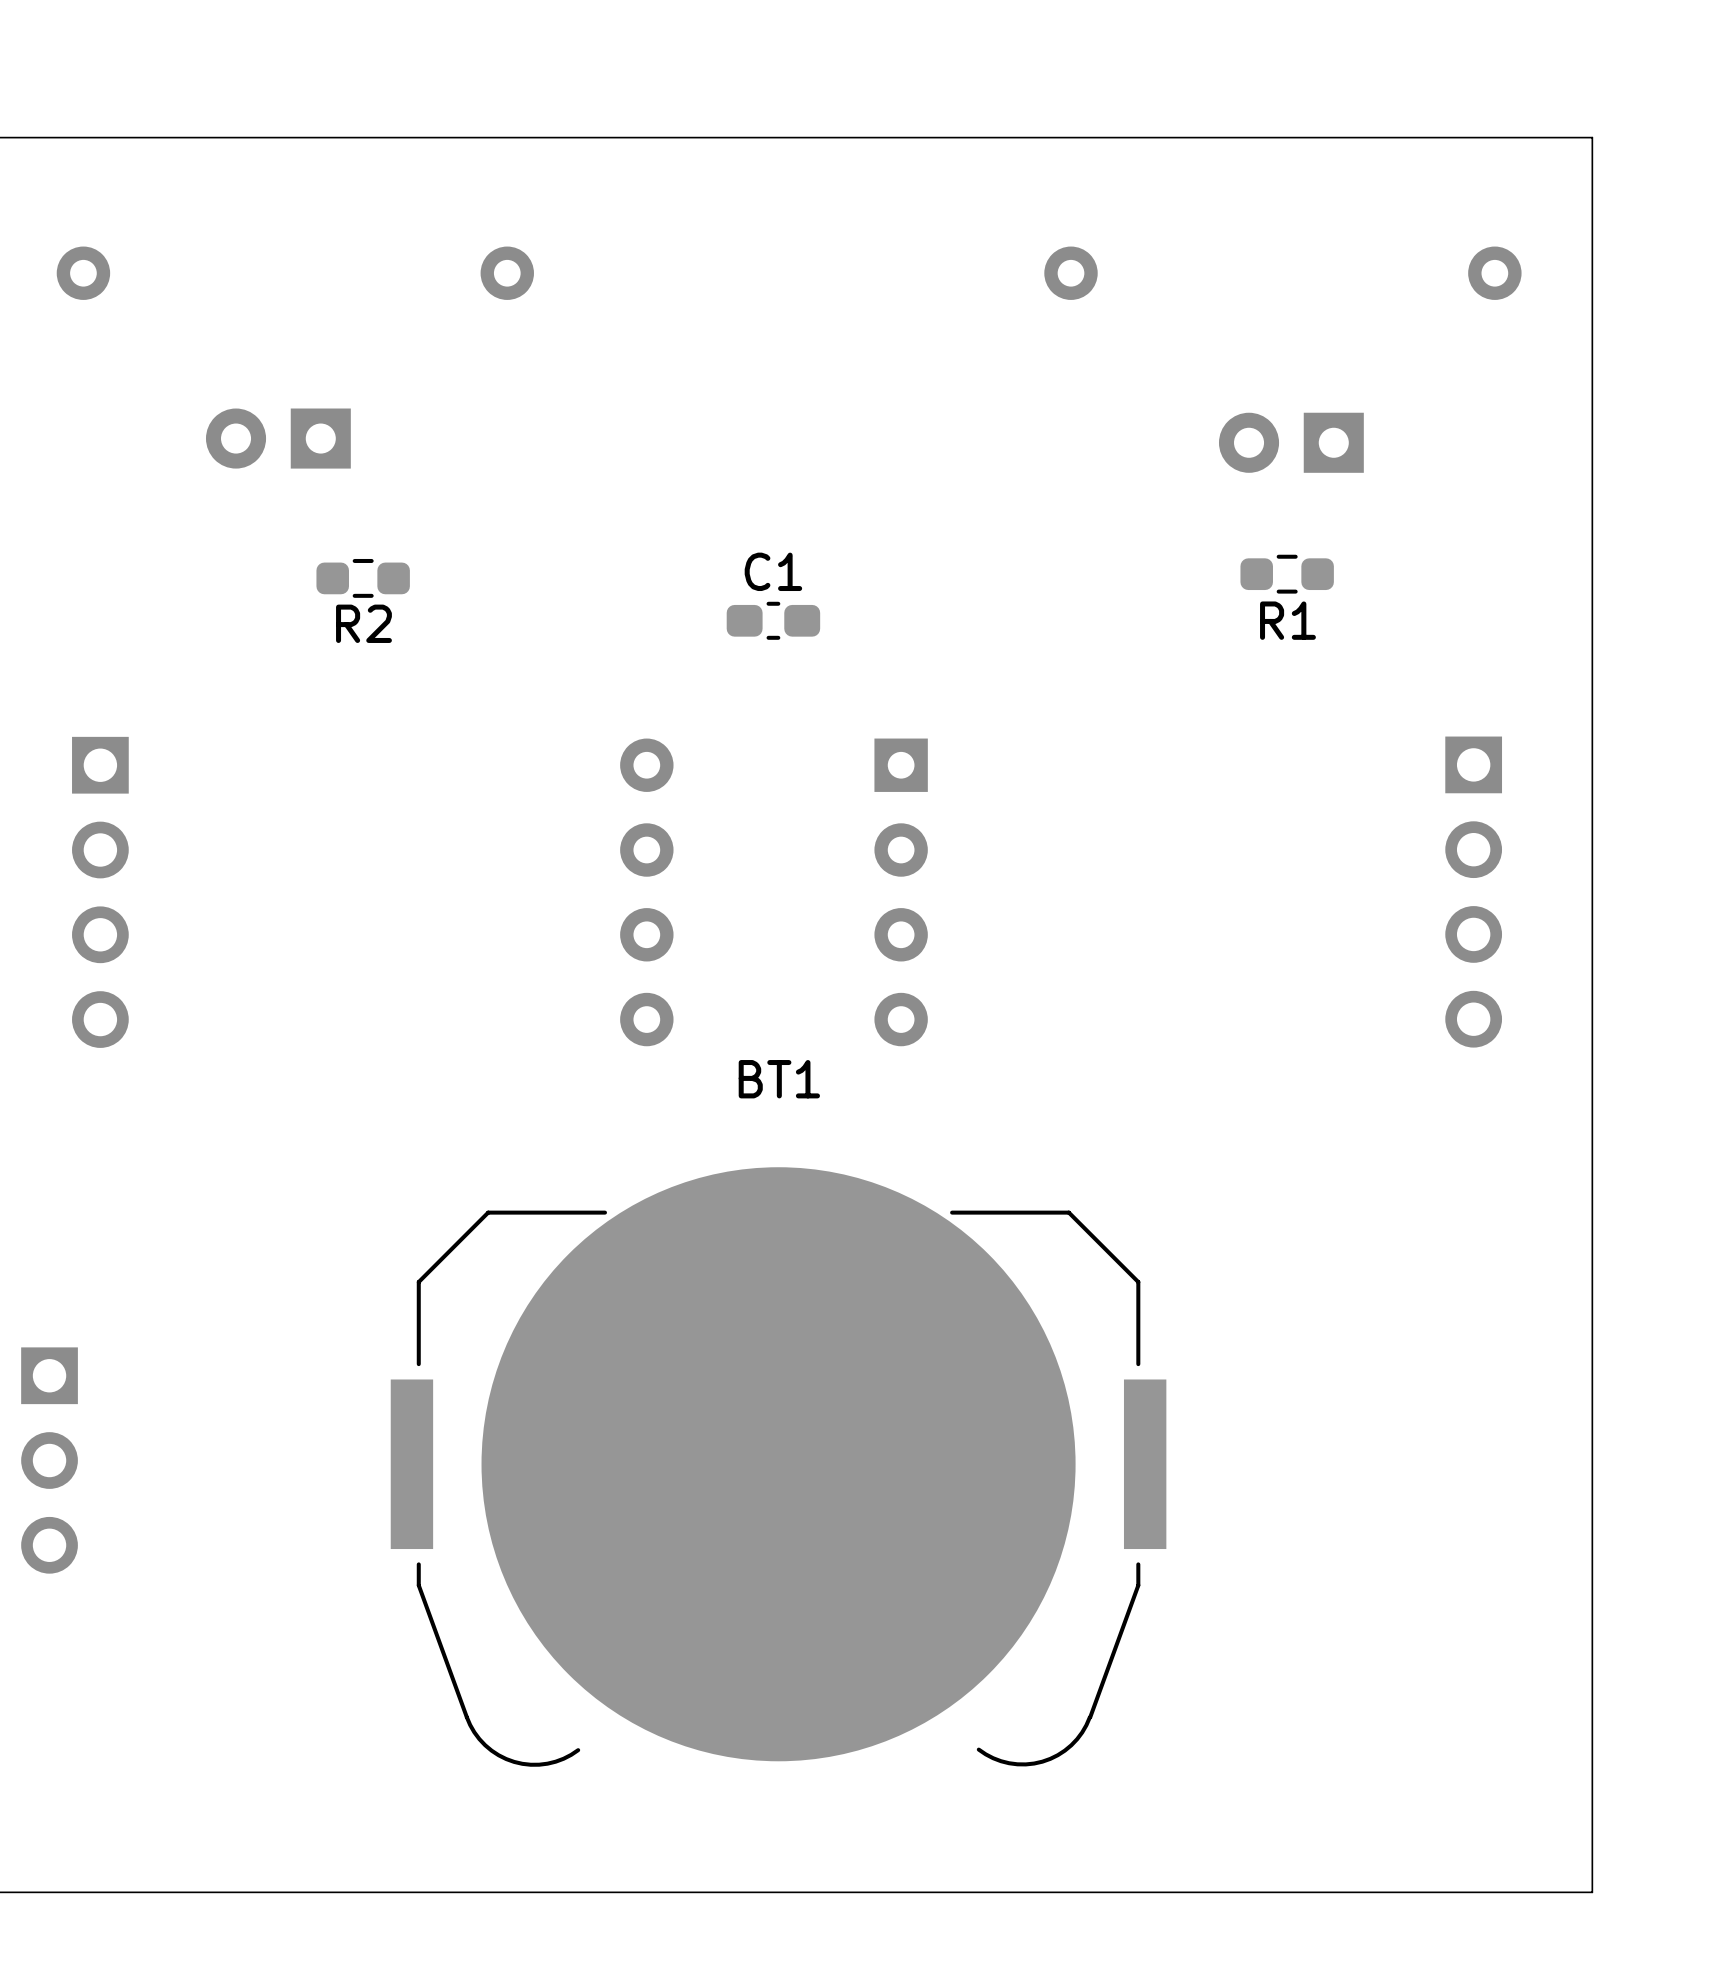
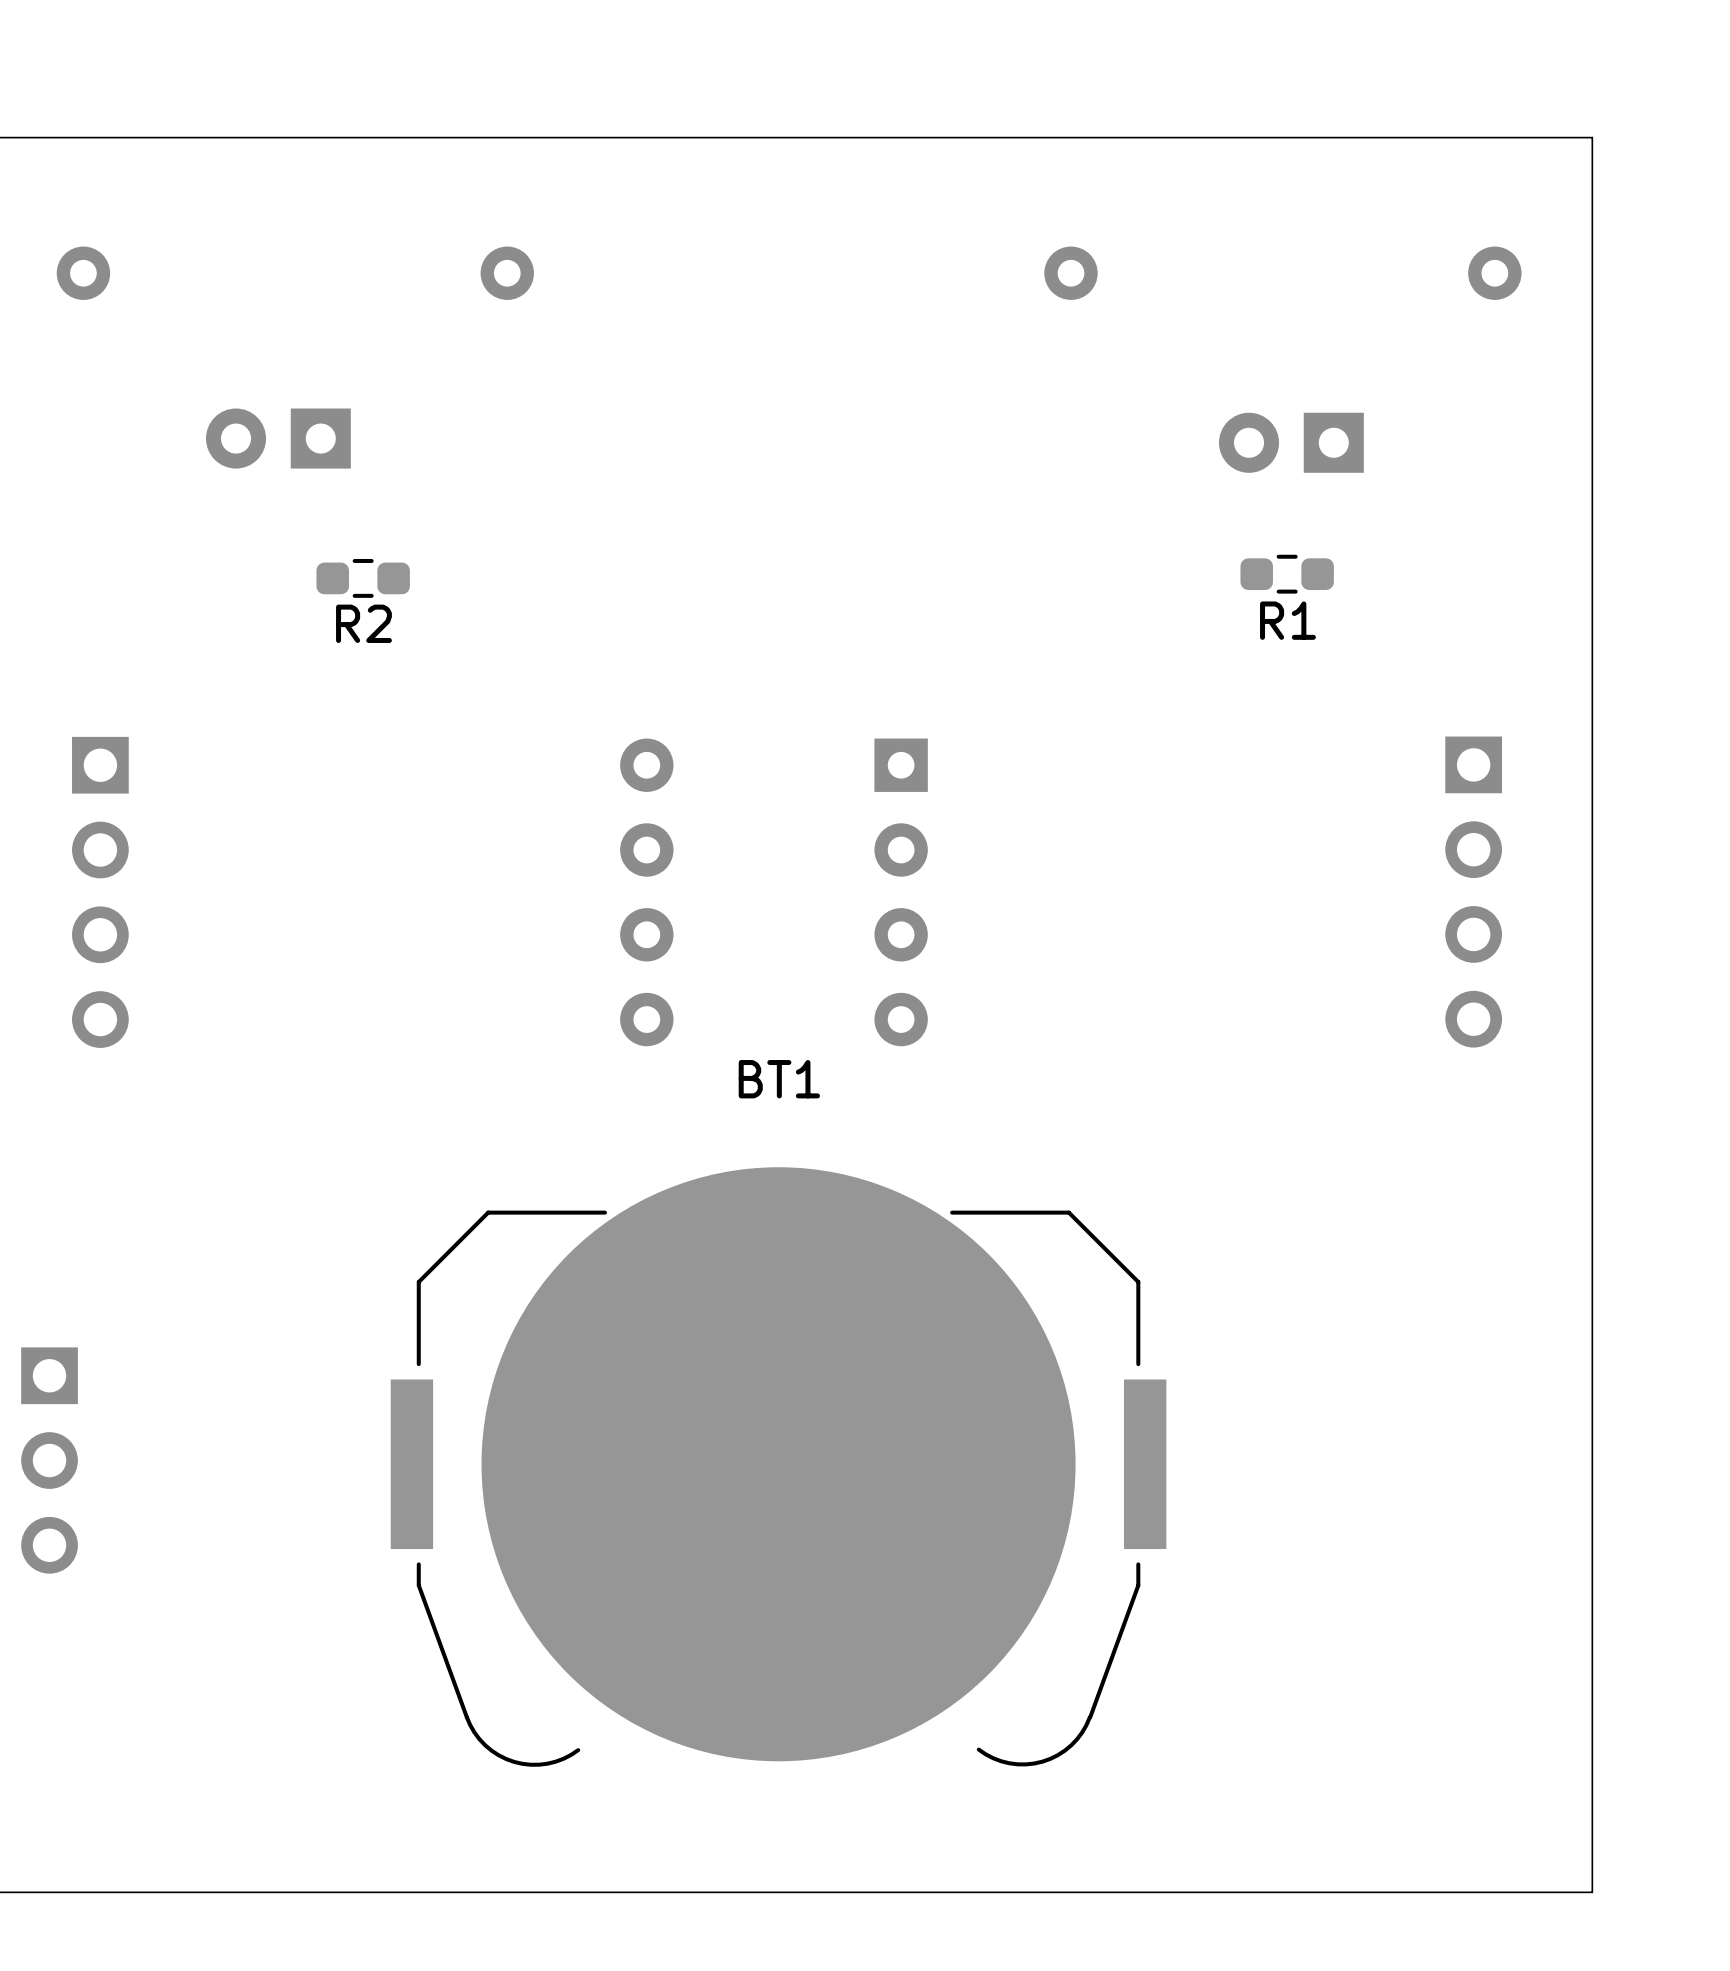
C1: (773, 620) -> none

